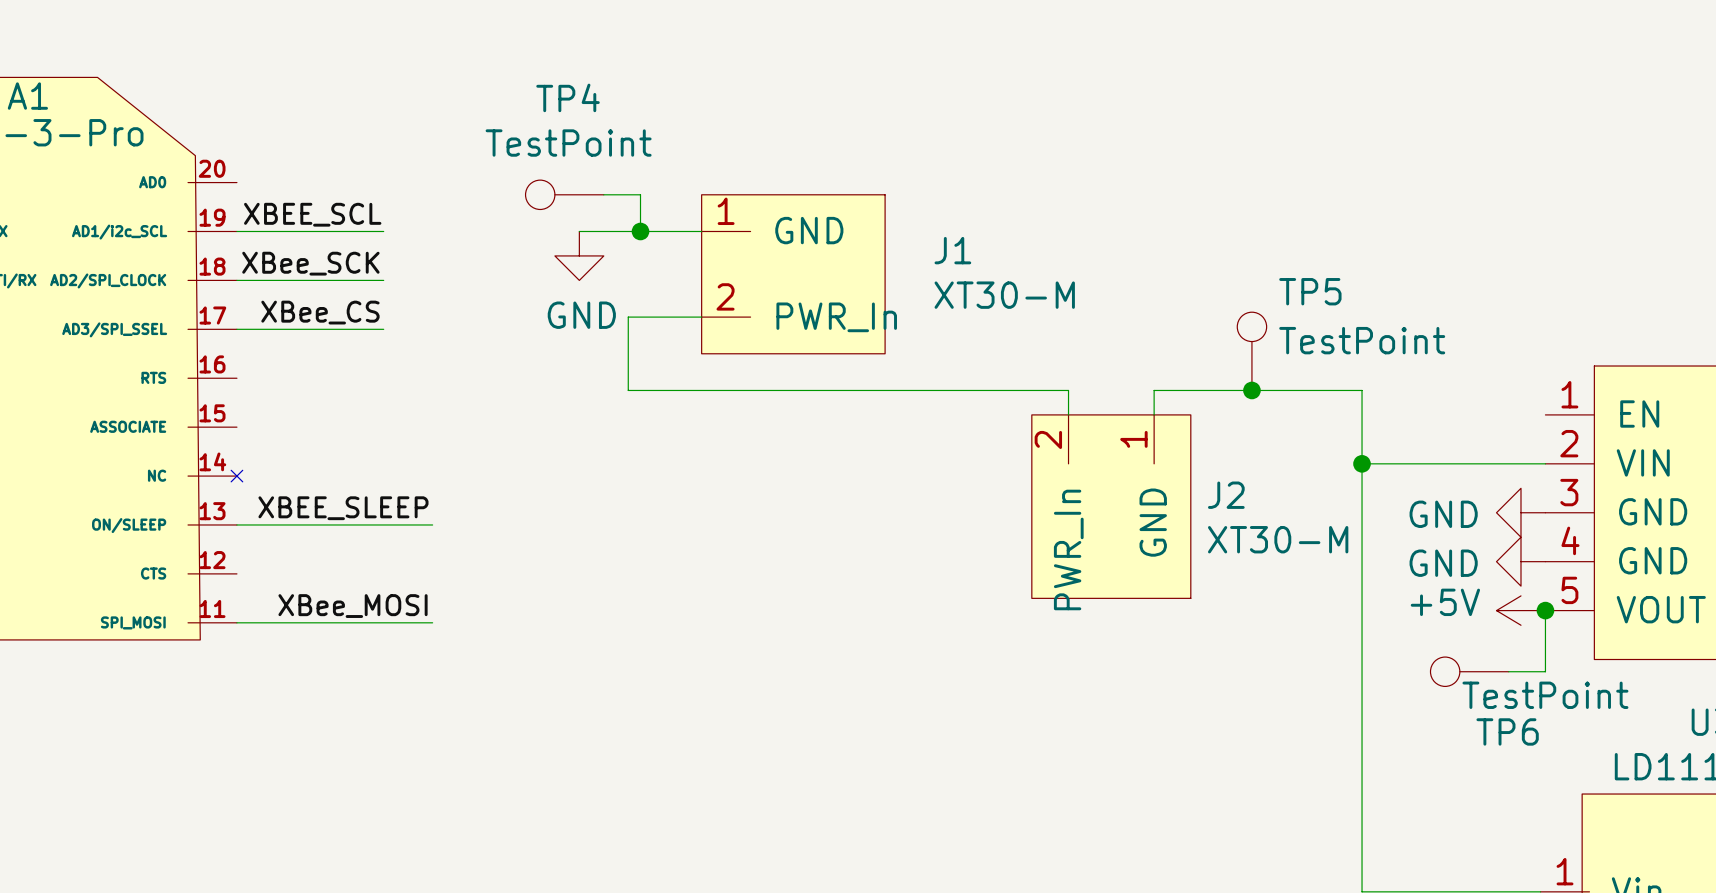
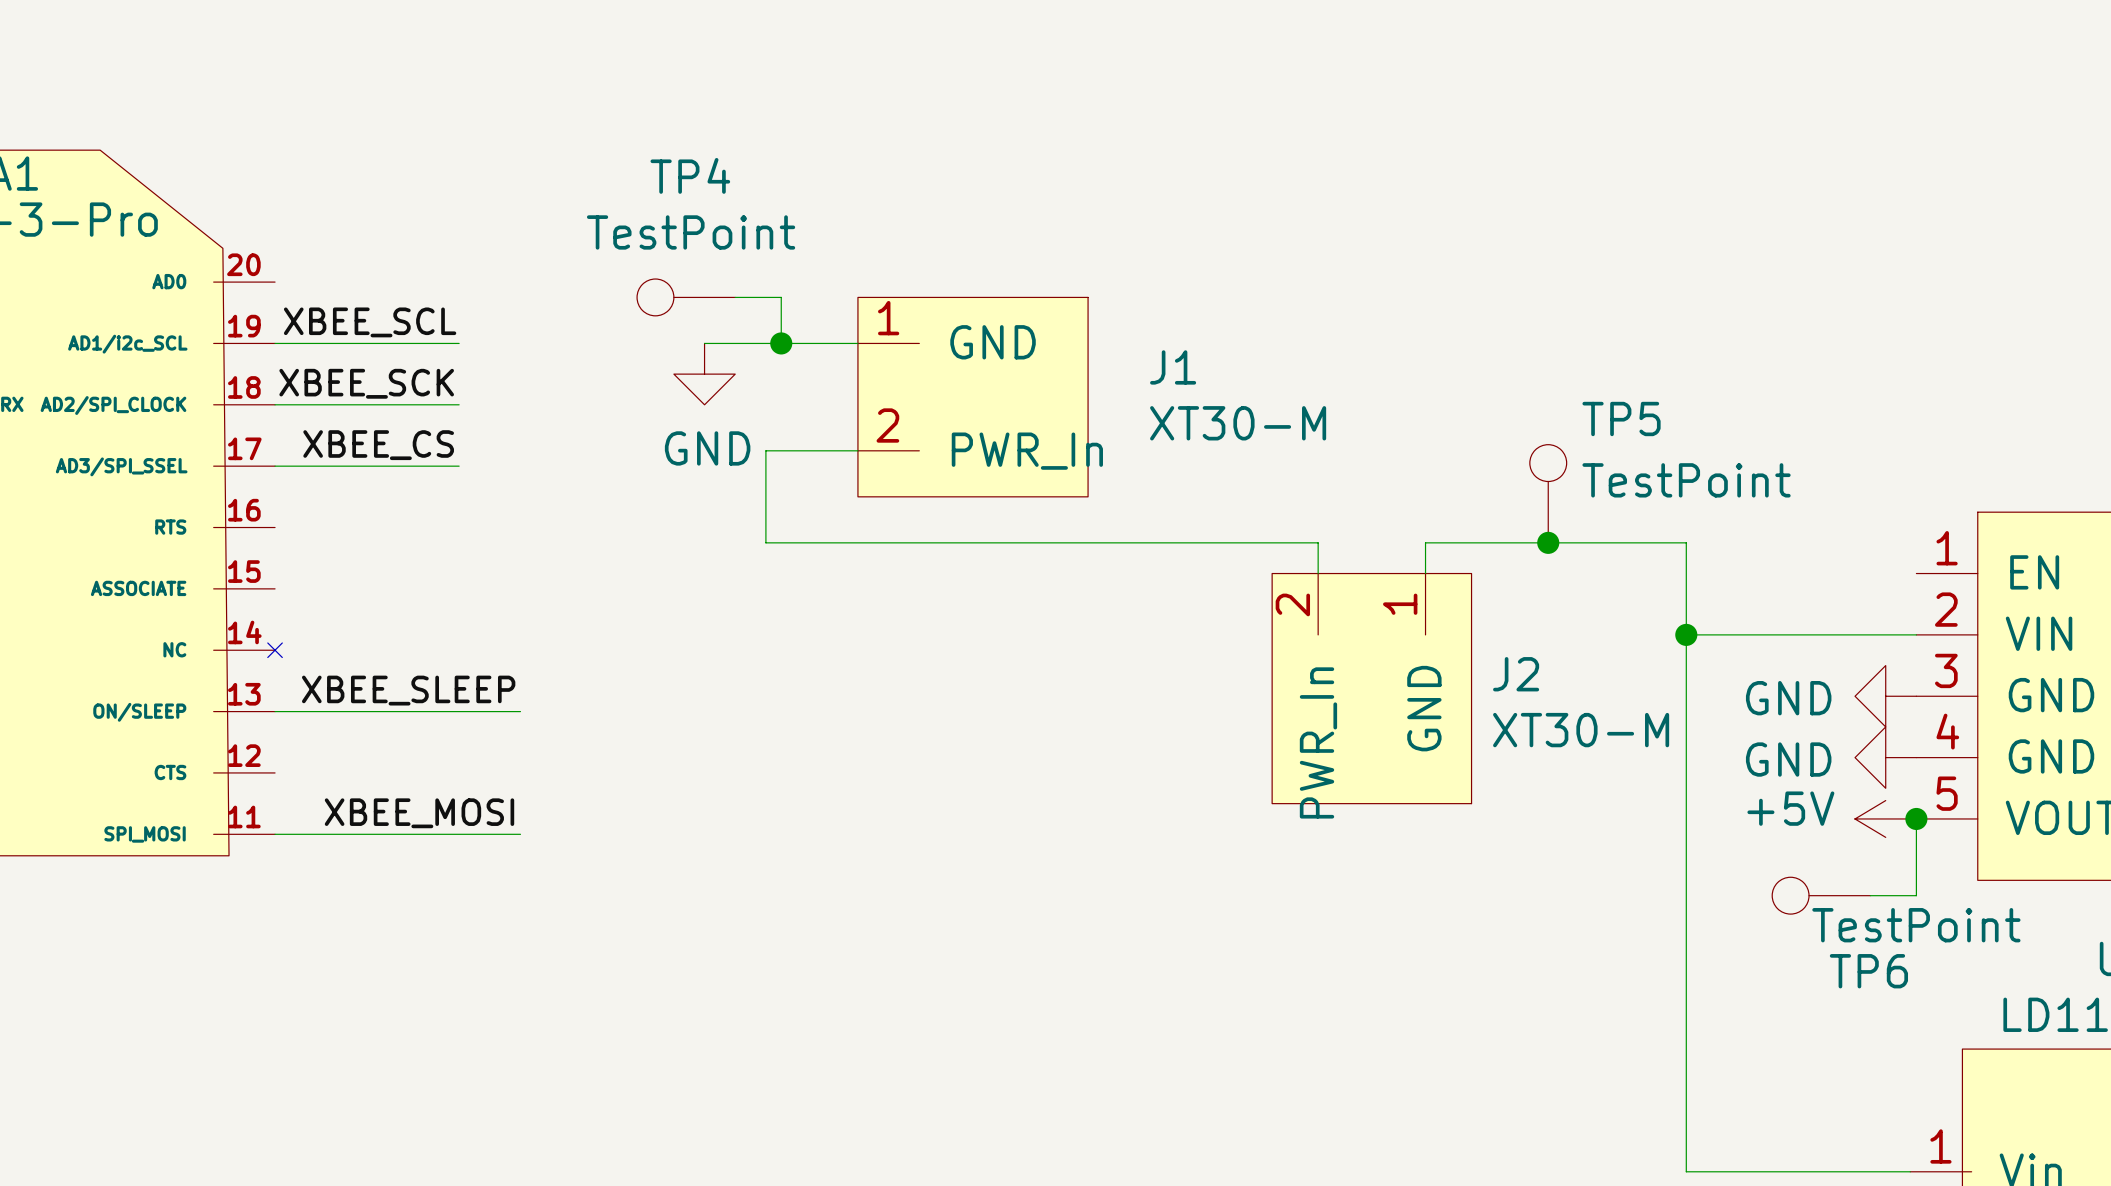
label: XBee_SCK (310, 263) -> XBEE_SCK (366, 383)
label: XBee_CS (320, 312) -> XBEE_CS (378, 445)
label: XBee_MOSI (353, 606) -> XBEE_MOSI (419, 813)

